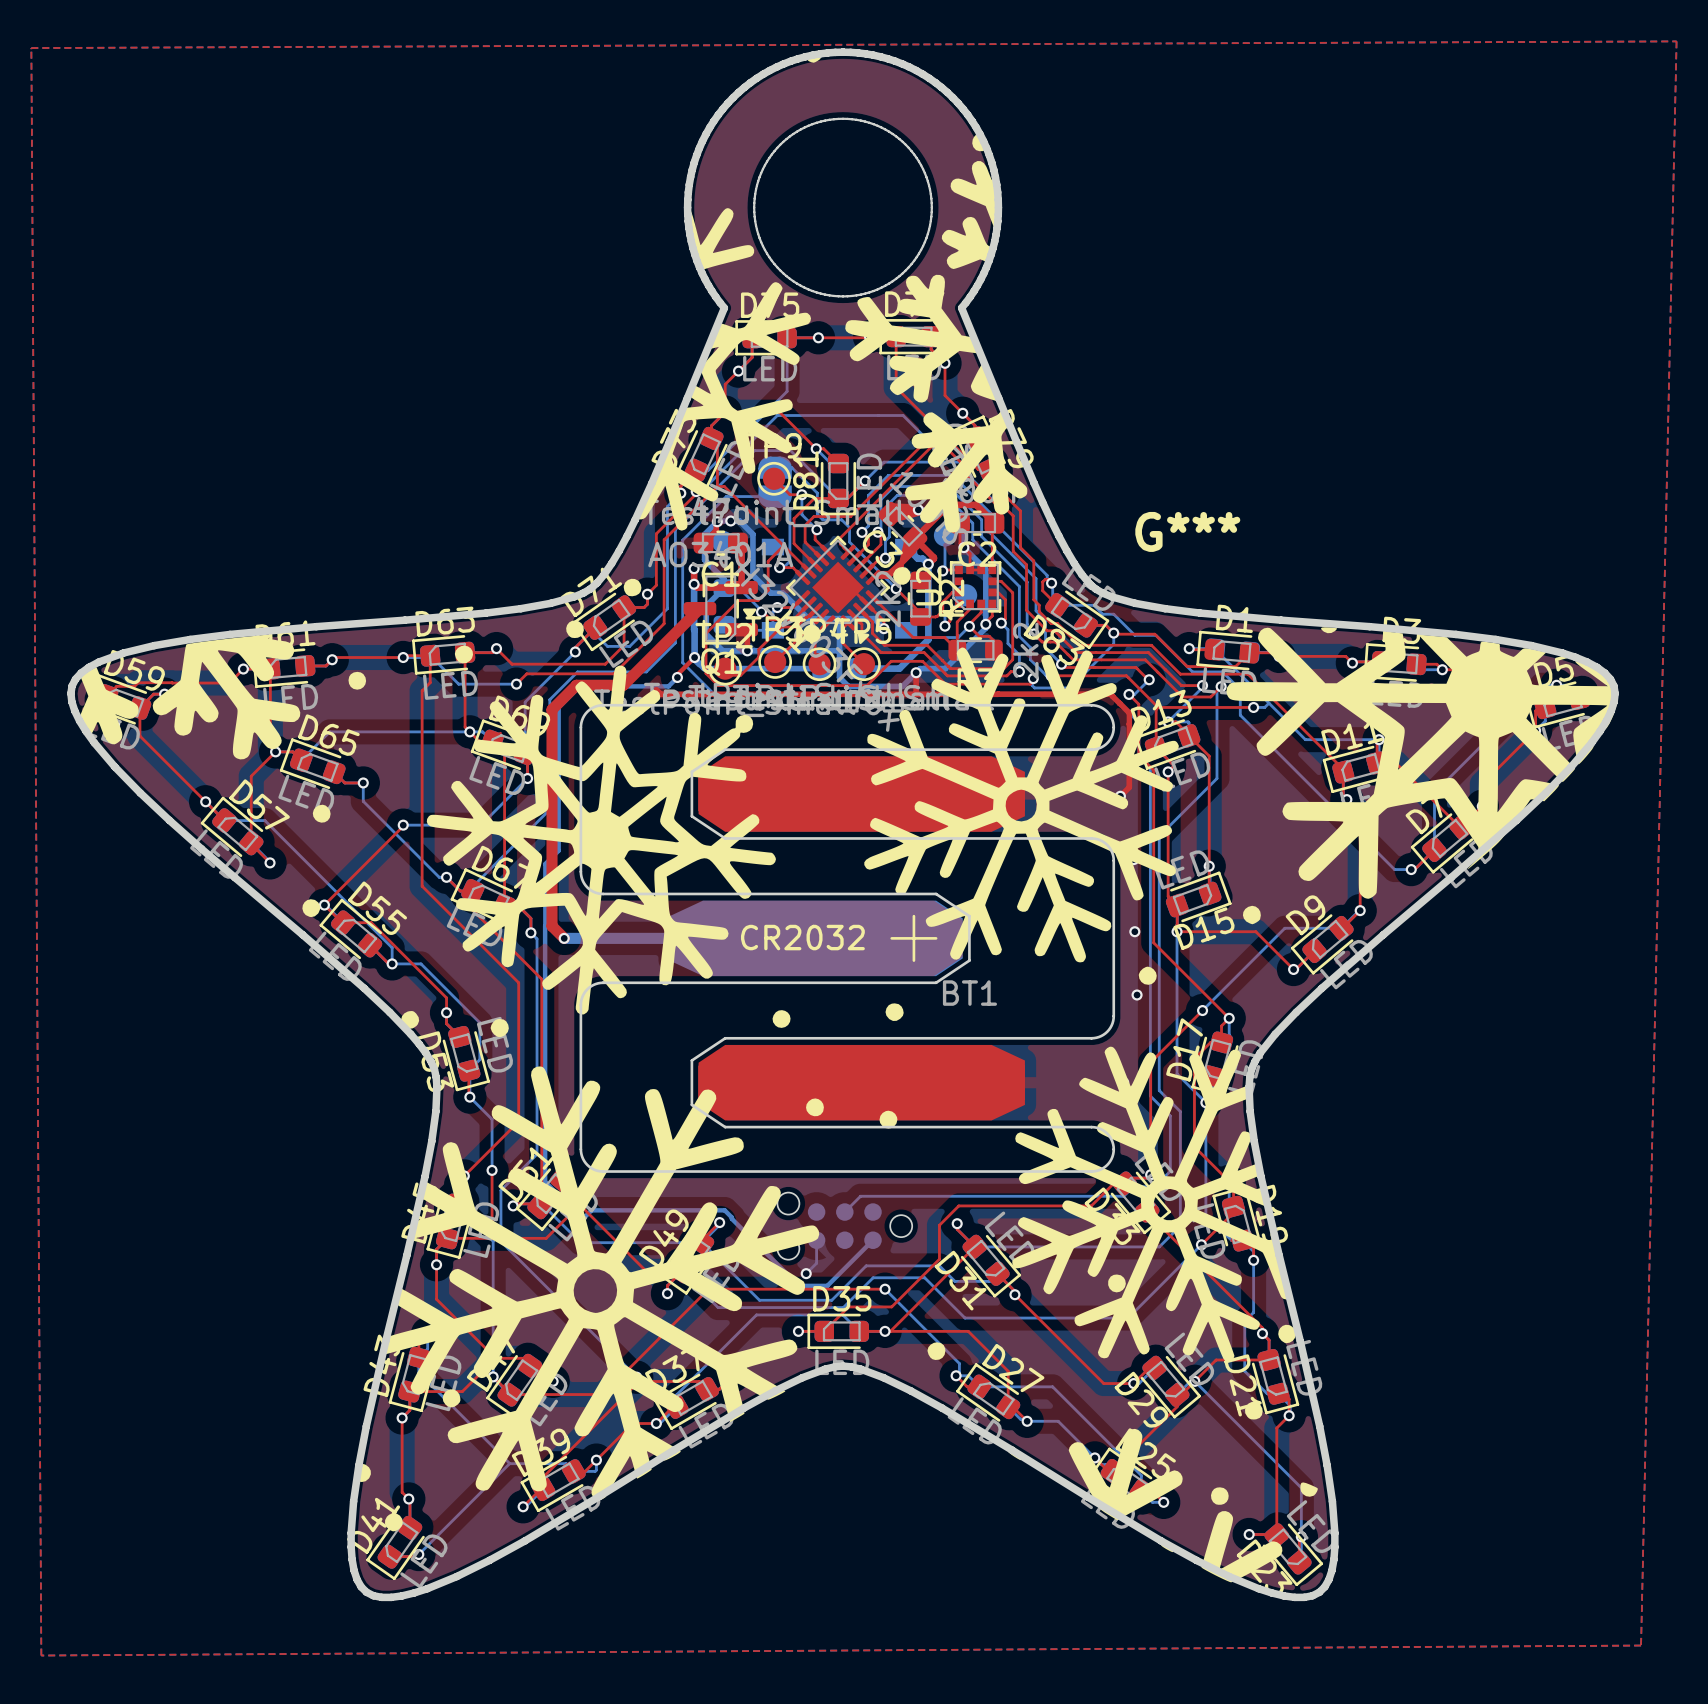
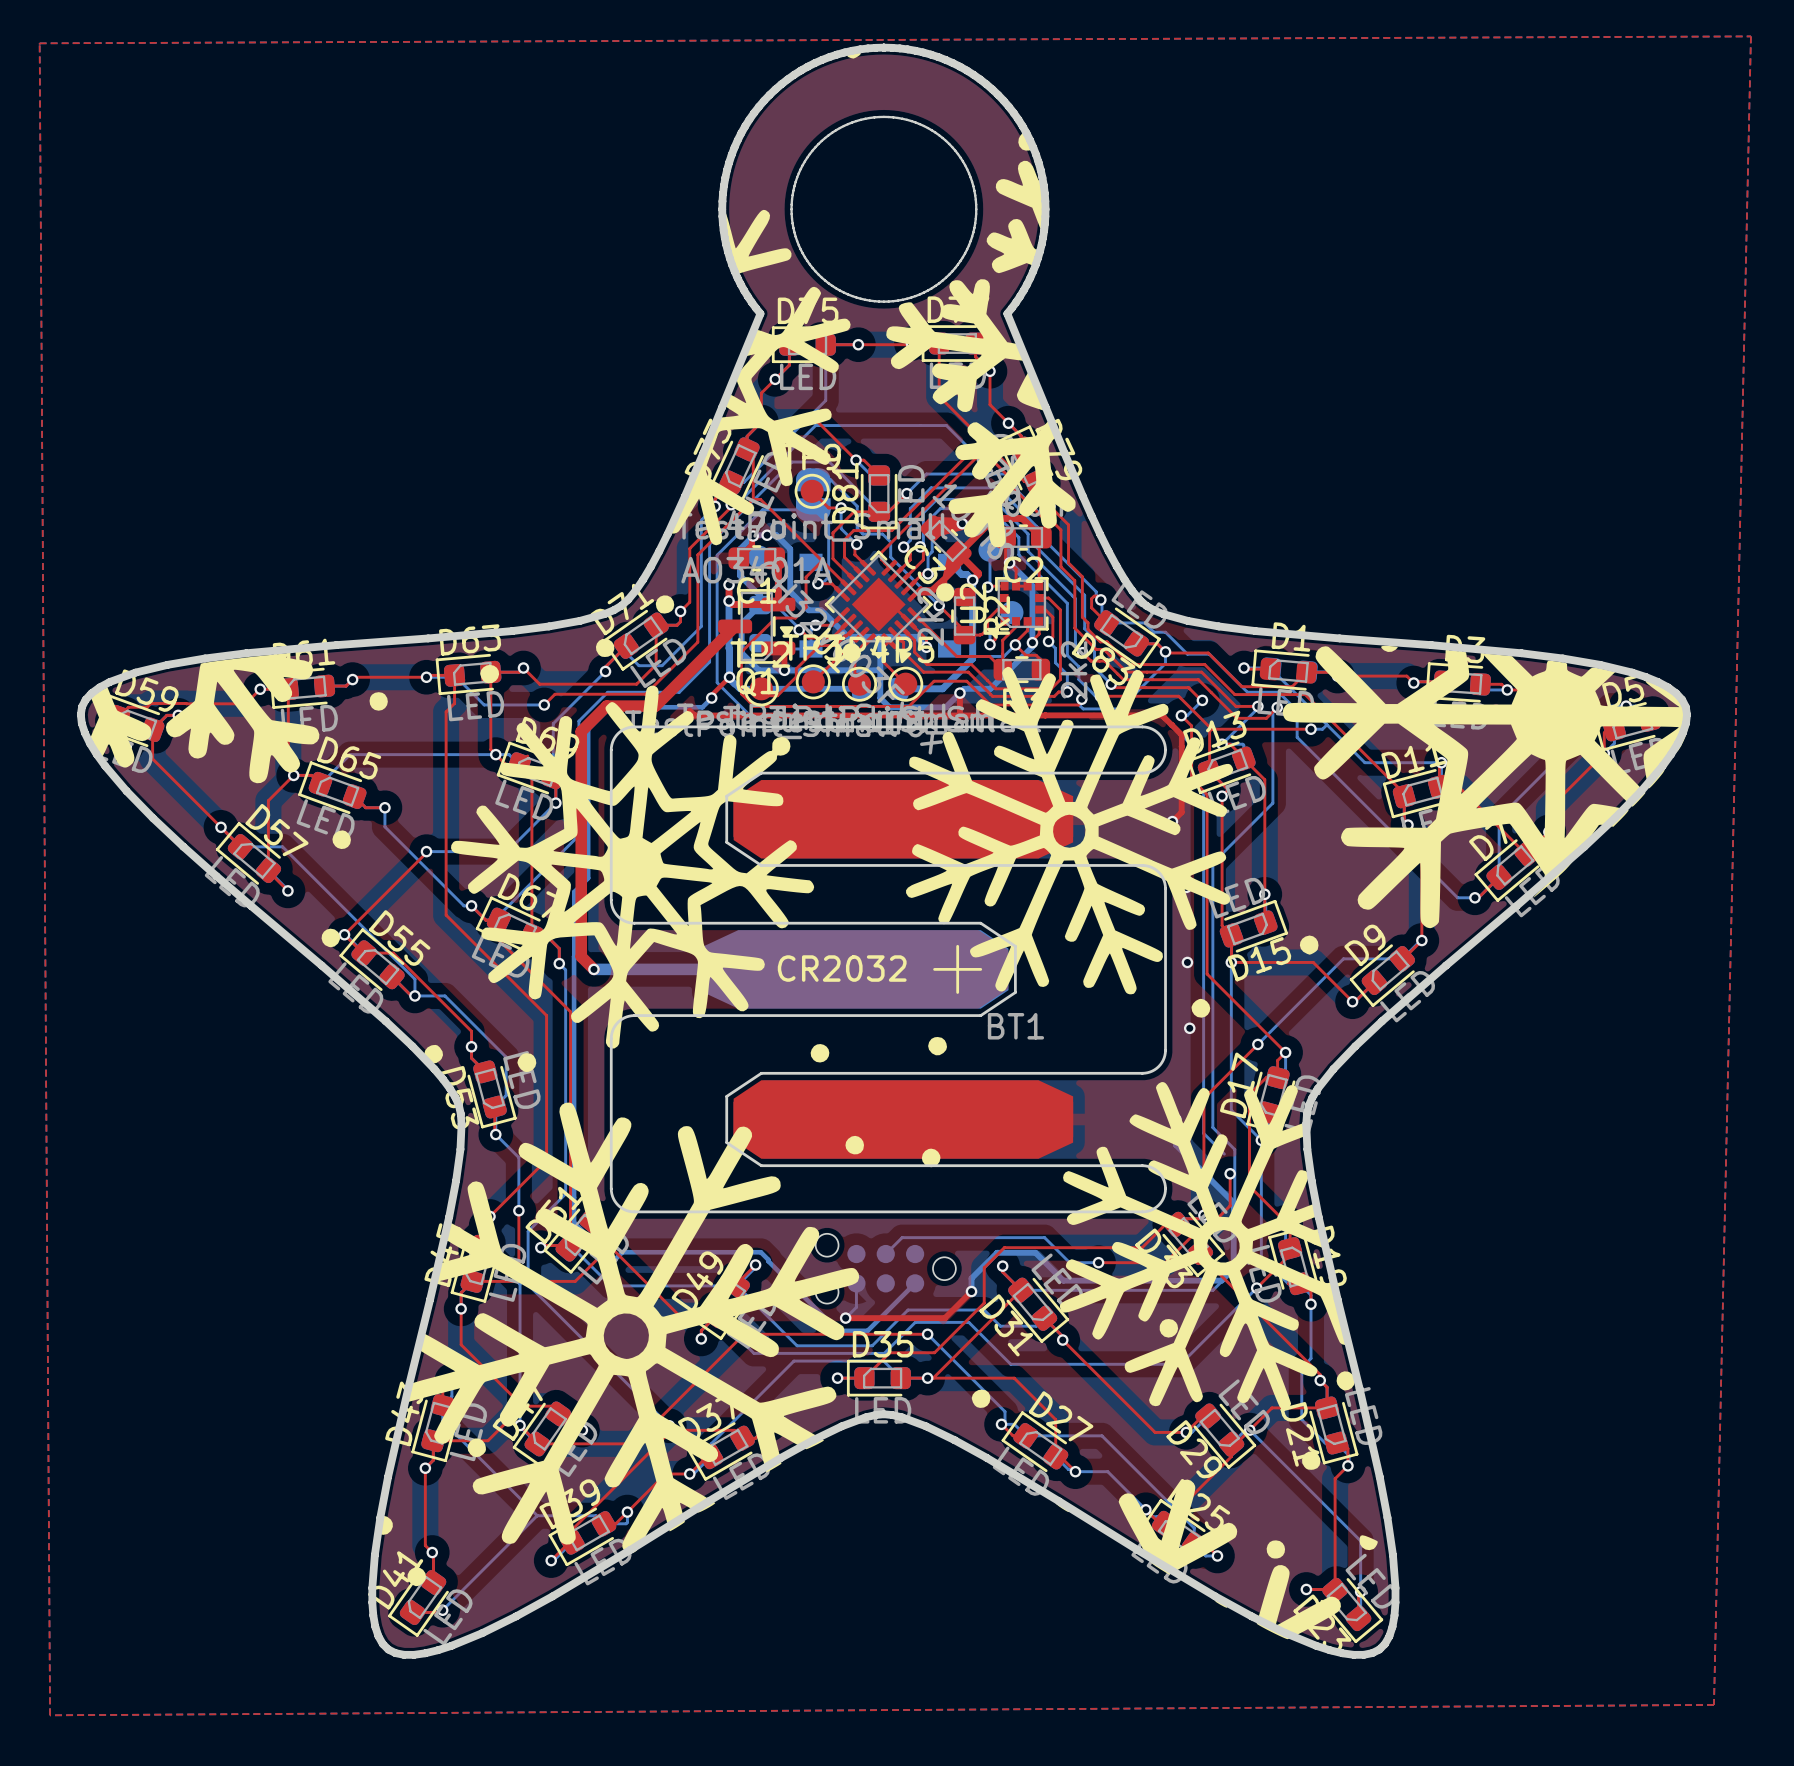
drawing: none -> [80, 52, 1690, 1640]
G***: (843, 819) -> none
bottom track: none -> (1175, 1119) (1175, 1144) (1233, 1202) (1233, 1268) (1221, 1280) (1063, 1280) (1035, 1252) (997, 1252) (971, 1278) (971, 1291)
bottom track: (1170, 1116) (1170, 1171) (1154, 1186) (1133, 1186) (1123, 1196) (997, 1196) -> (1098, 1262) (1069, 1262) (1044, 1237)
top track: none -> (1230, 1173) (1230, 1205) (1202, 1233) (1194, 1233) (1165, 1262) (1098, 1262)
via: none -> (1230, 1173)
via: none -> (1098, 1262)
top track: none -> (971, 1291) (944, 1318) (845, 1318)
via: none -> (971, 1291)

